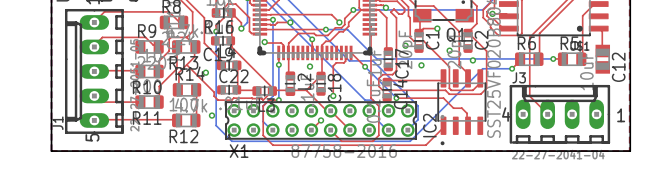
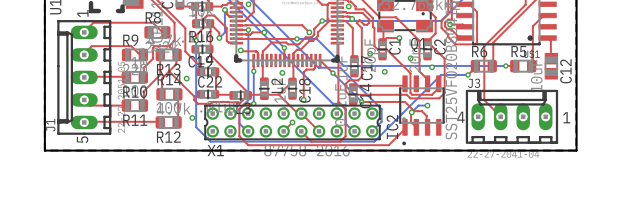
bottom track: none -> (427, 105) (418, 105) (411, 112)
via: none -> (427, 105)
top track: none -> (411, 112) (411, 122) (416, 127)
via: none -> (411, 112)

